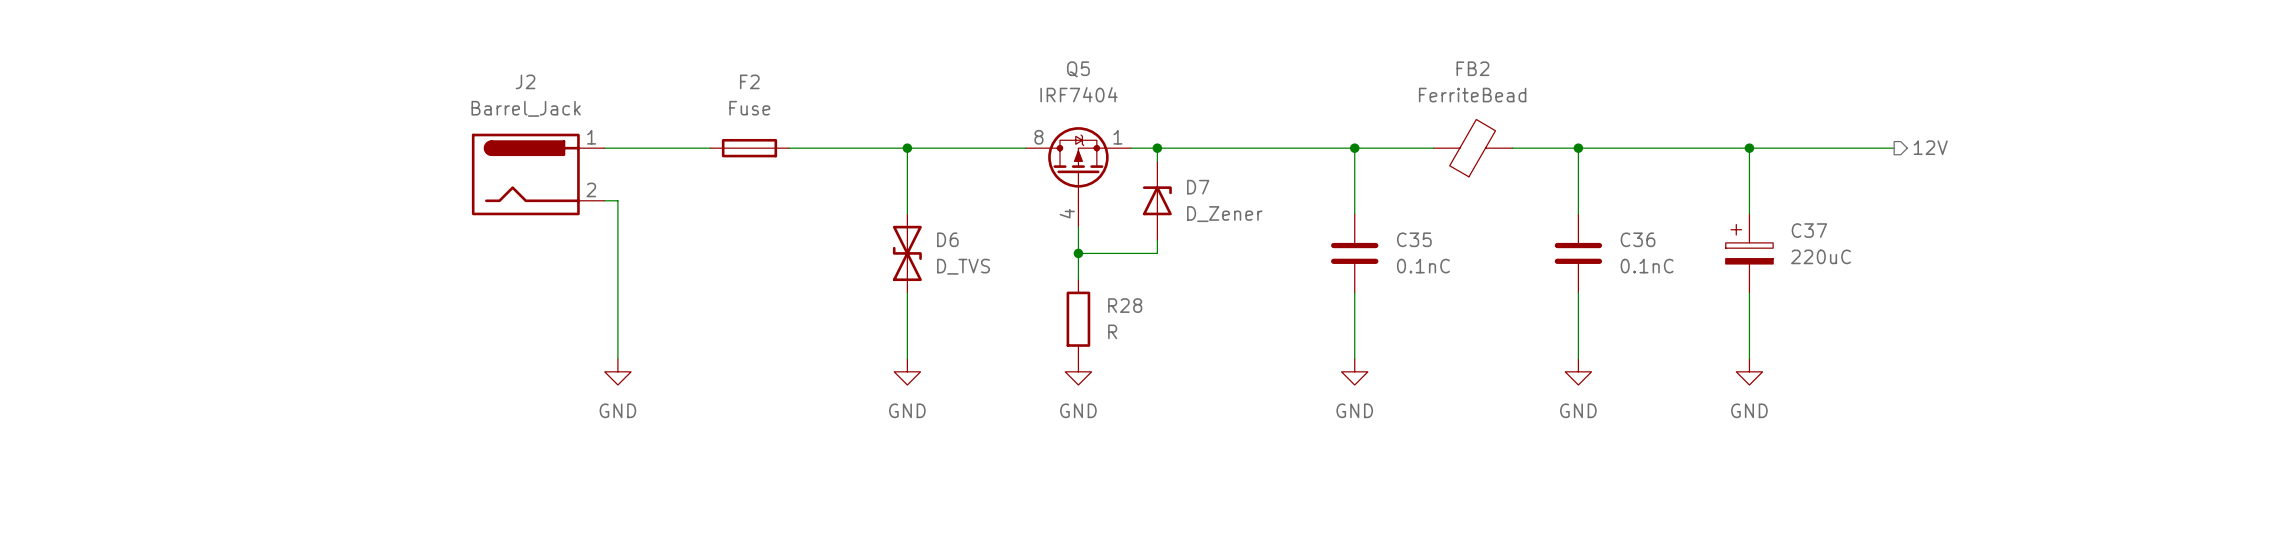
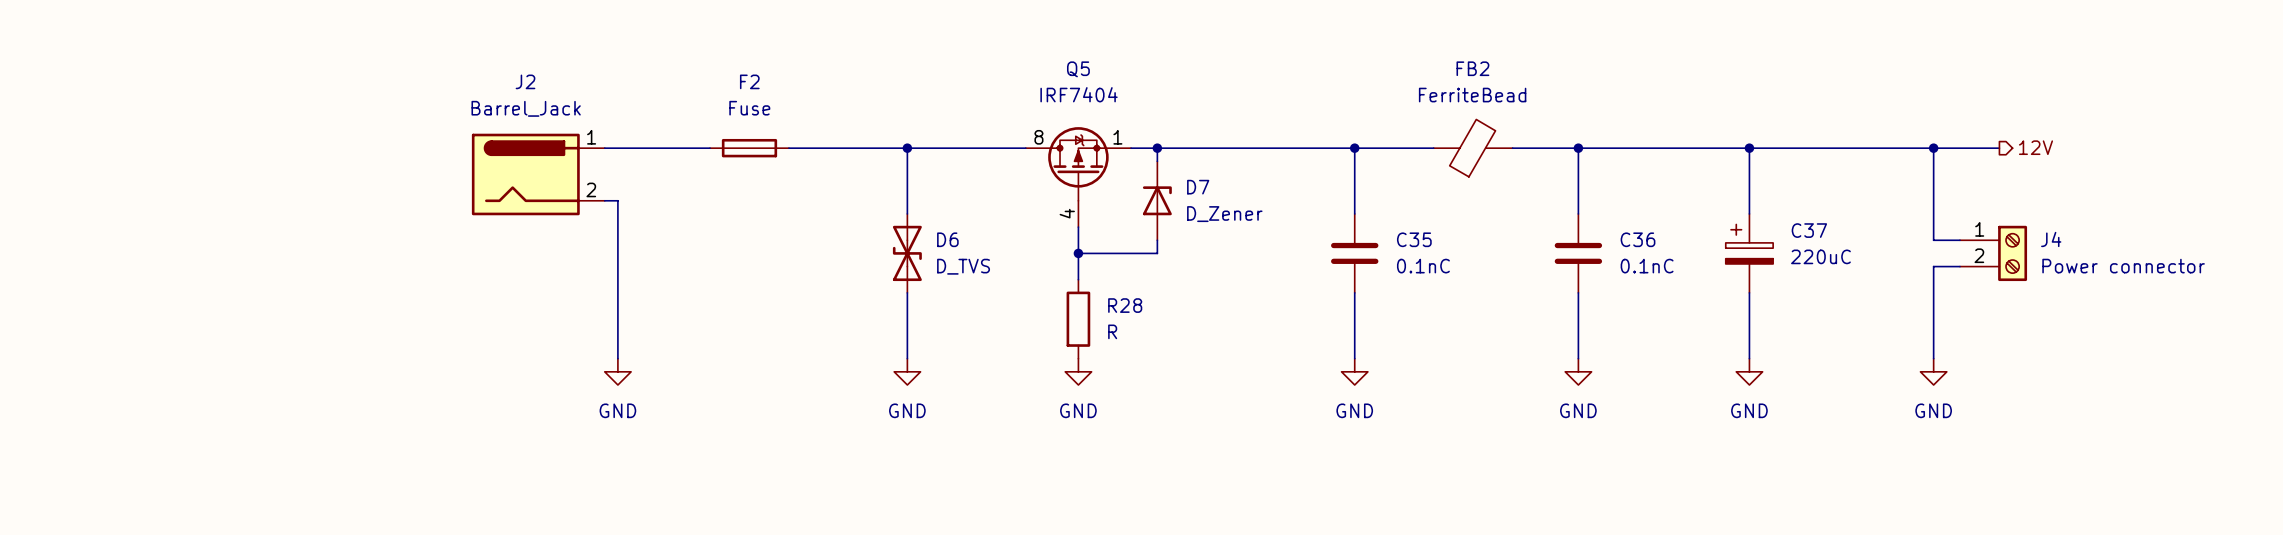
hierarchical label position: 12V (1930, 147) -> 12V (2035, 147)
wire: none -> (1894, 148) (1999, 148)
wire: none -> (1933, 148) (1933, 240) (1959, 240)
junction: none -> (1933, 148)
J4: none -> Power connector (1993, 253)
wire: none -> (1959, 266) (1933, 266) (1933, 358)
power symbol: none -> GND (1933, 371)

